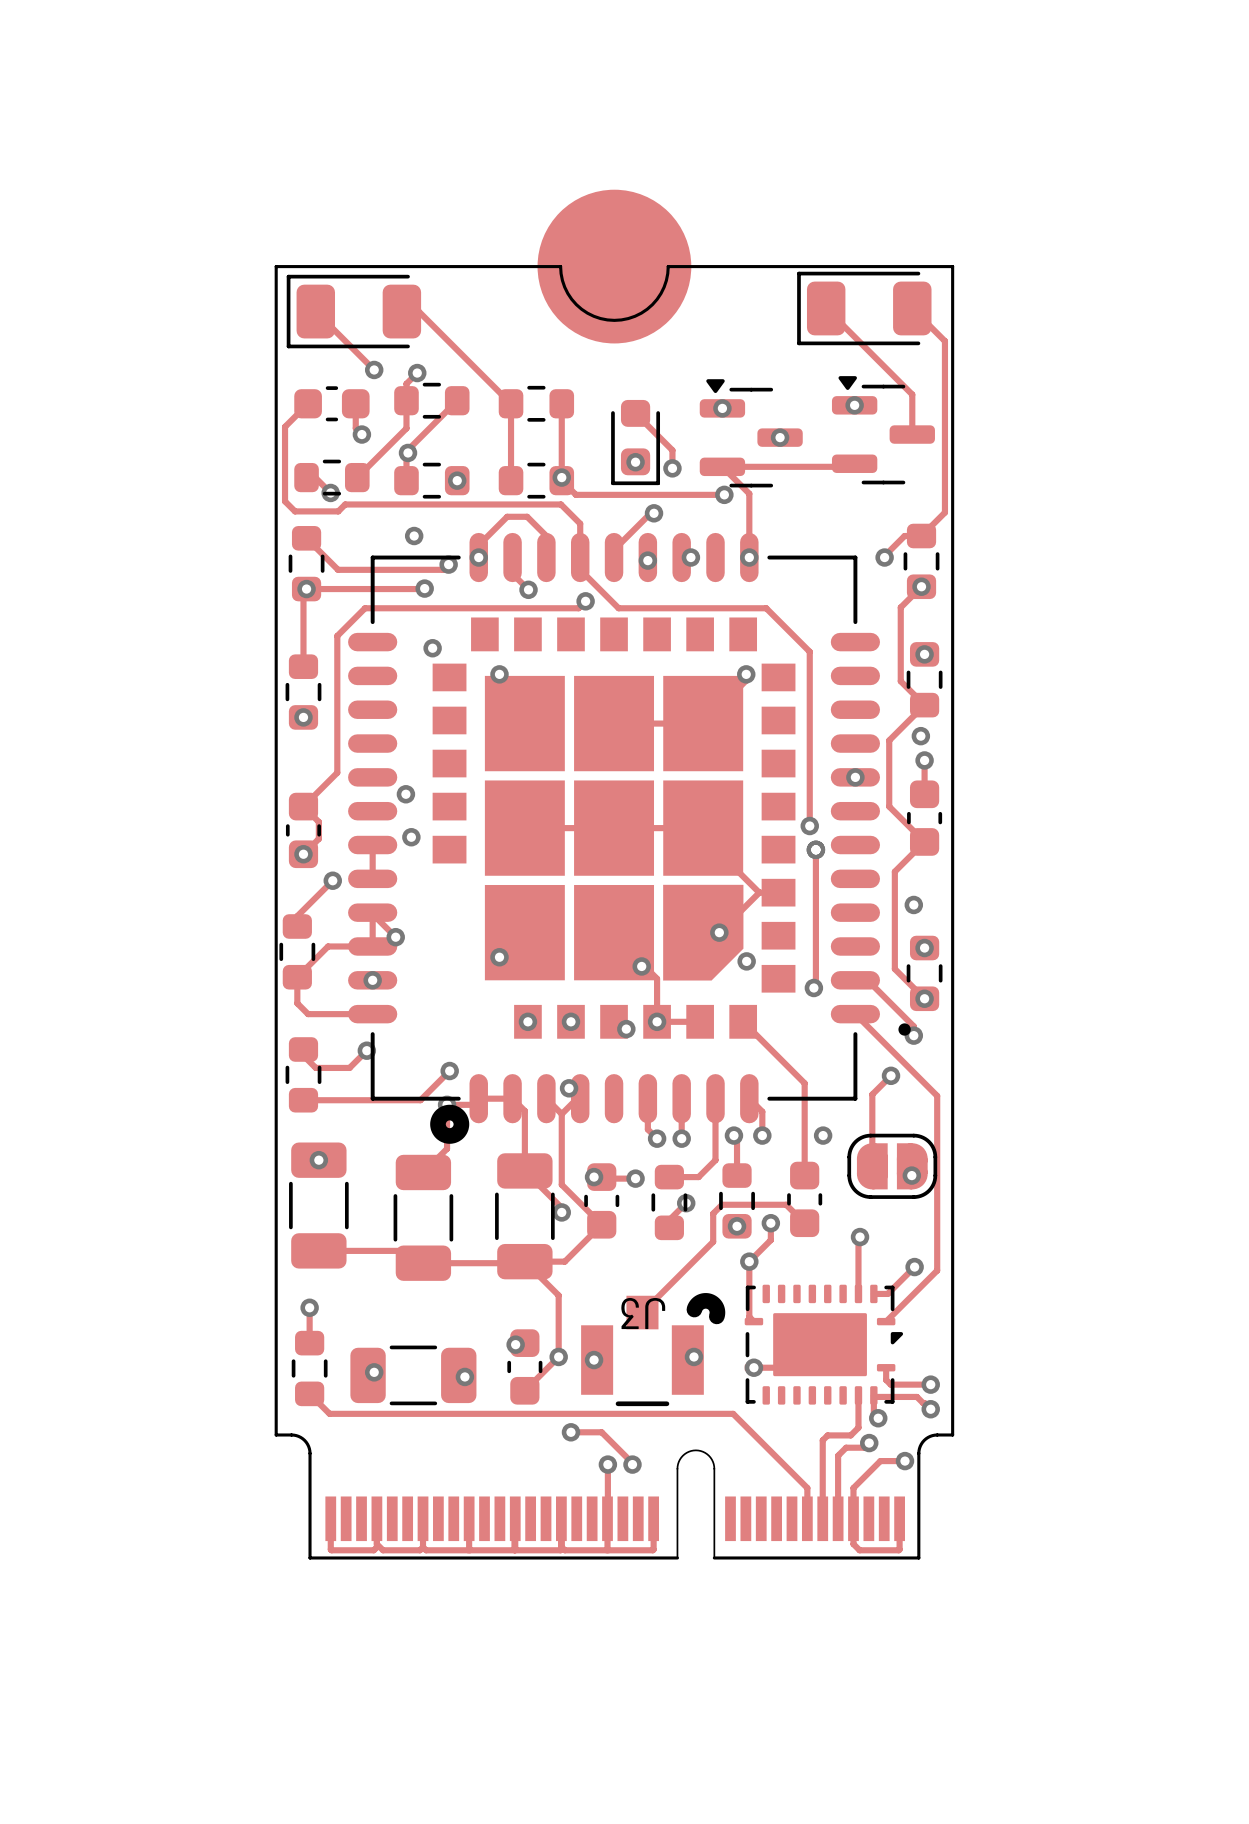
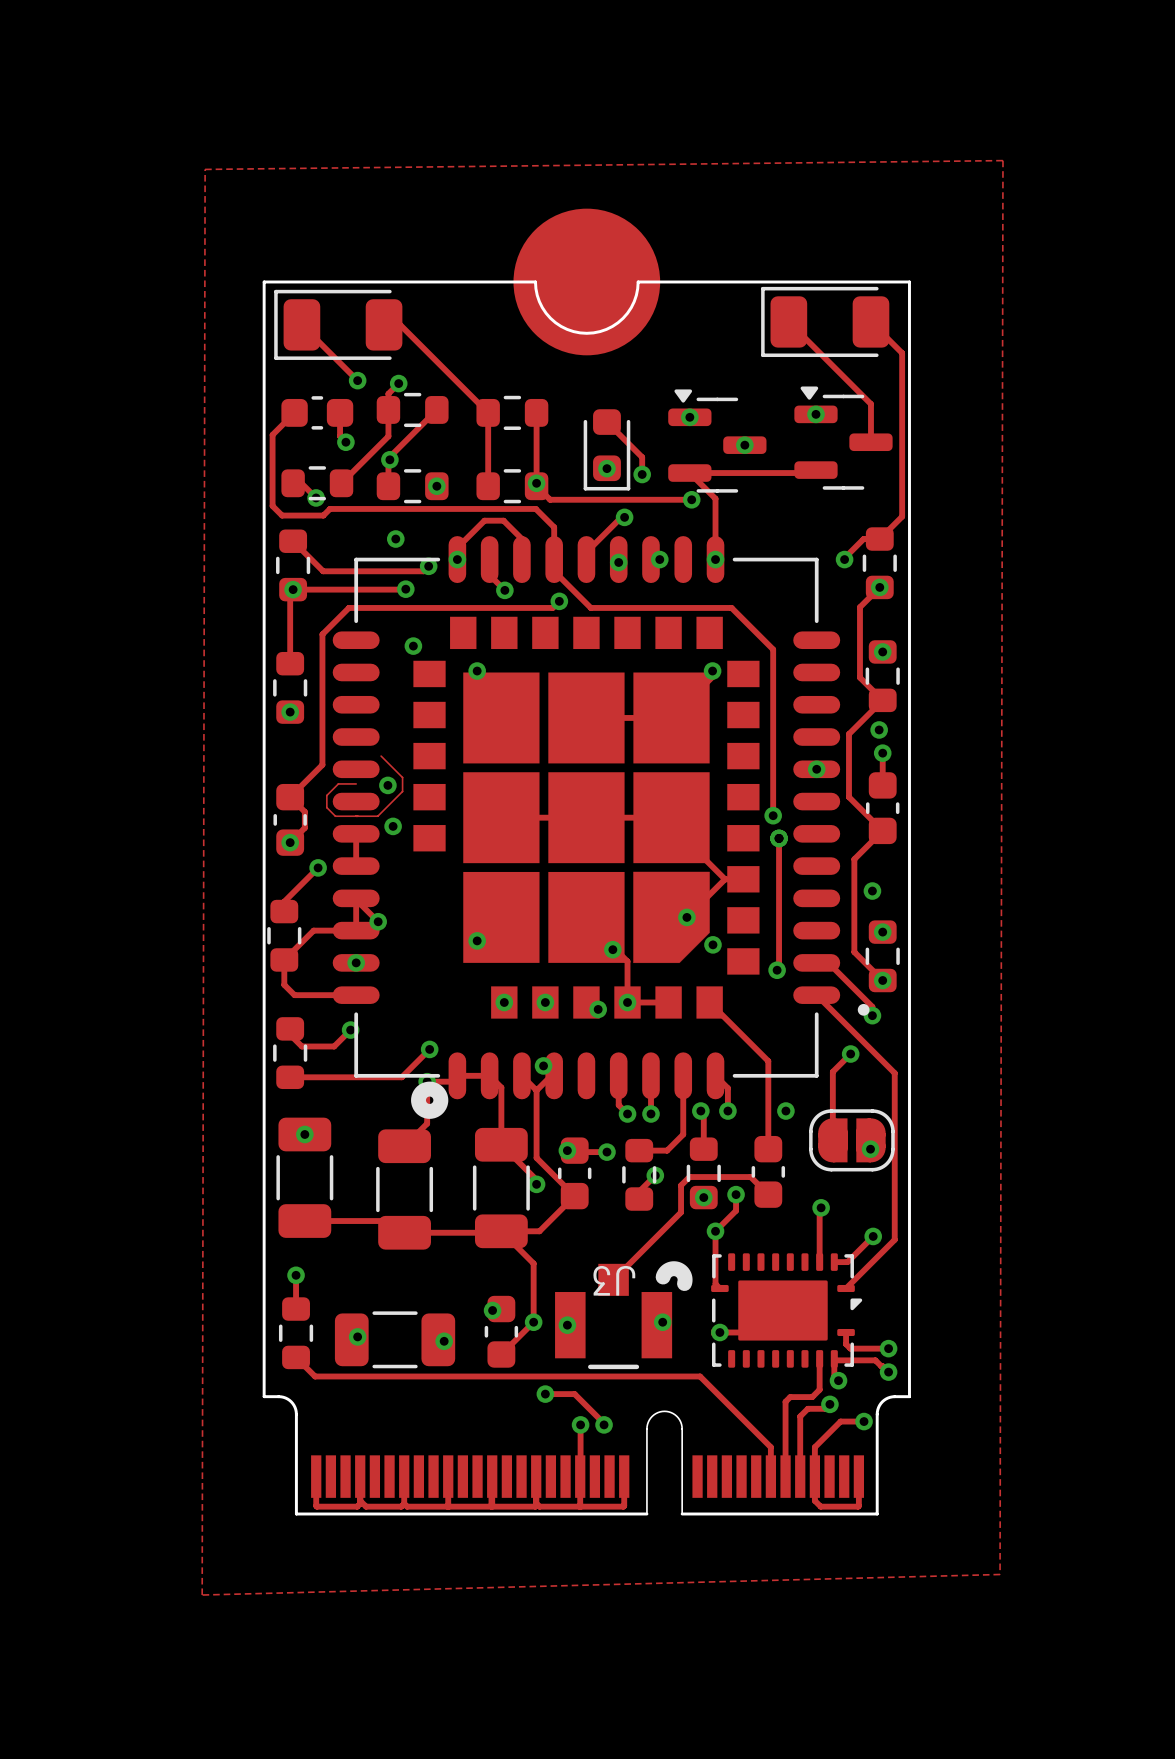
zone outline: none -> (1002, 160) (205, 169) (202, 1595) (1000, 1574) (1002, 160)
track: none -> (381, 756) (402, 777) (402, 791) (377, 816) (335, 816) (326, 807) (326, 795) (338, 783) (356, 783)

